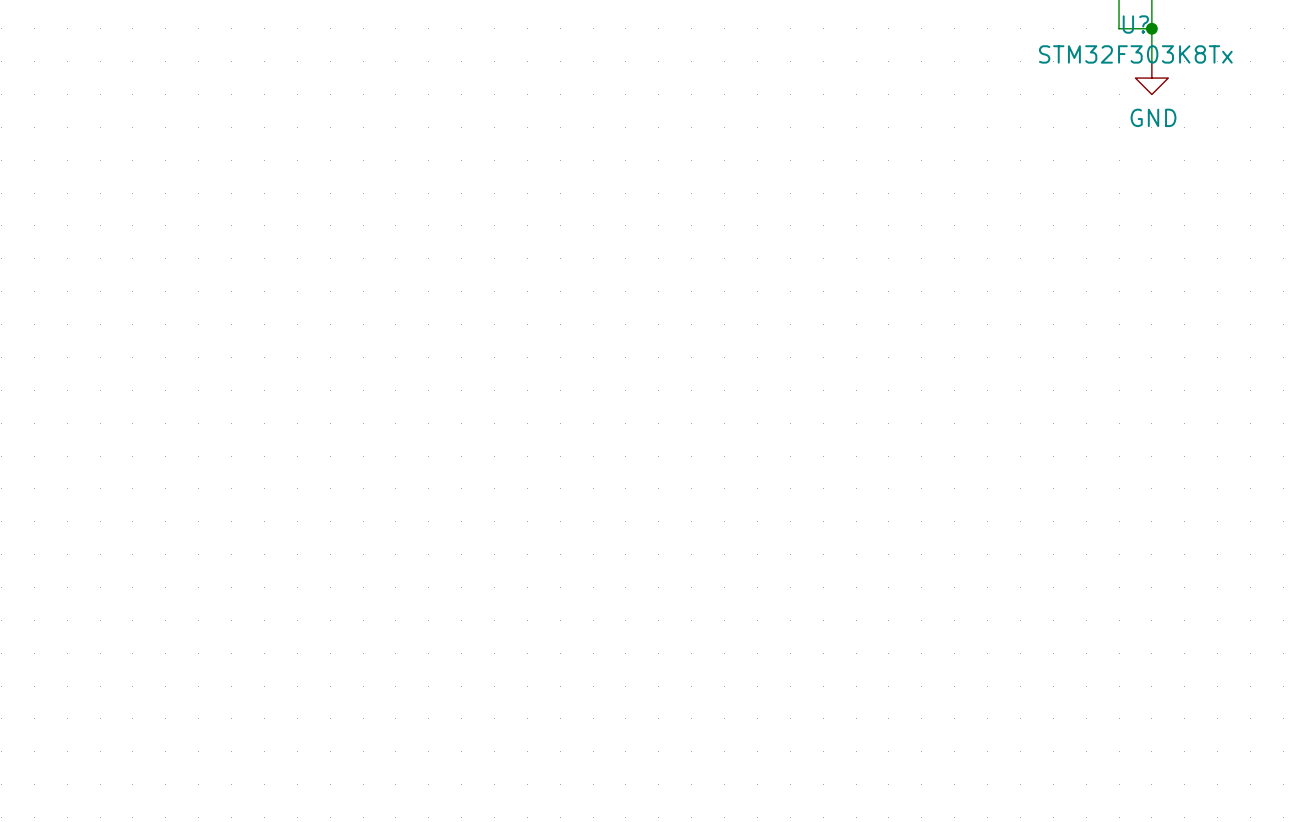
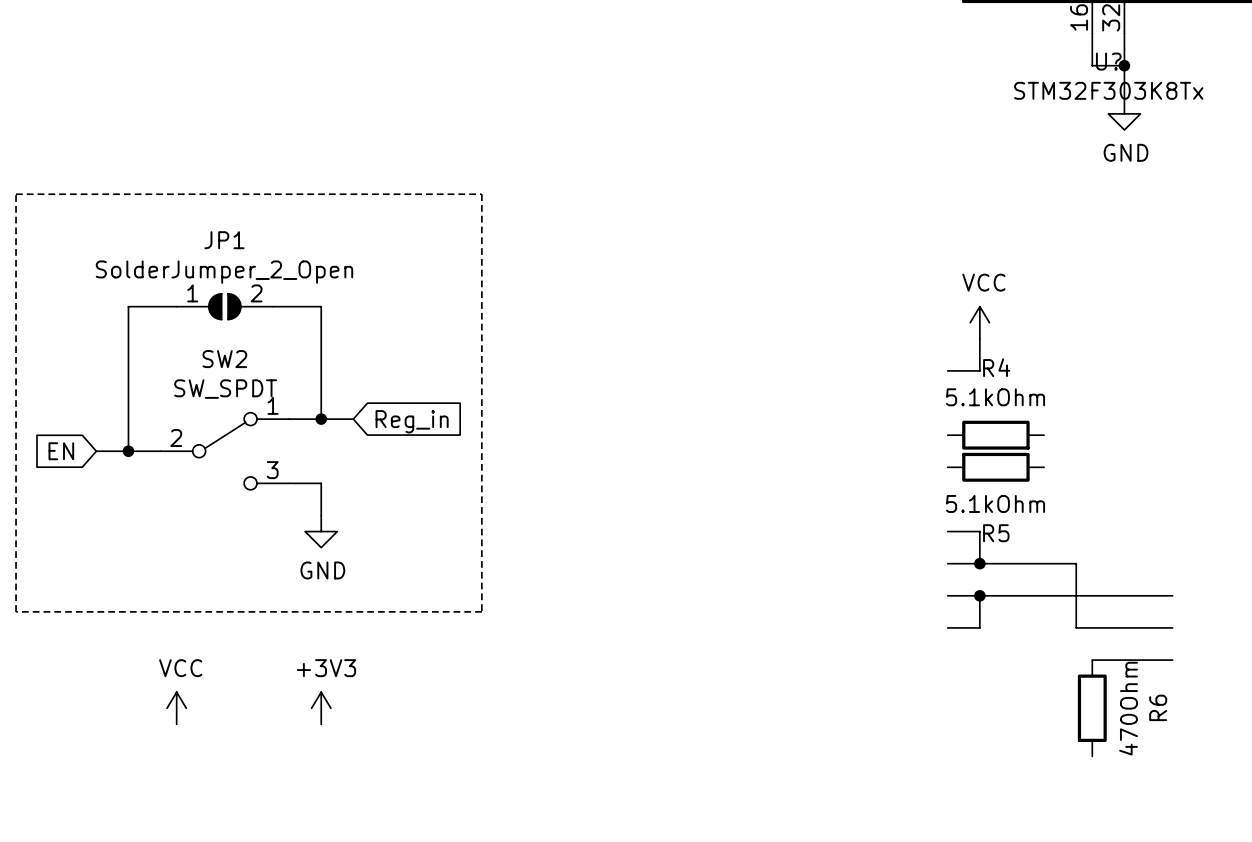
line: none -> (16, 194) (16, 611) (481, 611) (481, 194) (16, 194)
wire: none -> (176, 306) (128, 306) (128, 451)
JP1: none -> SolderJumper_2_Open (224, 306)
wire: none -> (273, 306) (321, 306) (321, 419)
power symbol: none -> VCC (979, 322)
wire: none -> (979, 338) (979, 370) (947, 370)
wire: none -> (289, 419) (353, 419)
junction: none -> (321, 419)
global label: none -> Reg_in (412, 421)
R4: none -> 5.1kOhm (995, 435)
global label: none -> EN (61, 451)
wire: none -> (96, 451) (160, 451)
junction: none -> (128, 451)
SW2: none -> SW_SPDT (224, 451)
R5: none -> 5.1kOhm (995, 467)
wire: none -> (289, 483) (321, 483) (321, 515)
power symbol: none -> GND (321, 531)
wire: none -> (947, 531) (979, 531) (979, 563)
wire: none -> (947, 563) (1076, 563) (1076, 627) (1172, 627)
junction: none -> (979, 563)
wire: none -> (947, 595) (1172, 595)
wire: none -> (979, 595) (979, 627) (947, 627)
junction: none -> (979, 595)
wire: none -> (1092, 660) (1172, 660)
power symbol: none -> VCC (176, 708)
power symbol: none -> +3V3 (321, 708)
R6: none -> 470Ohm (1092, 708)

